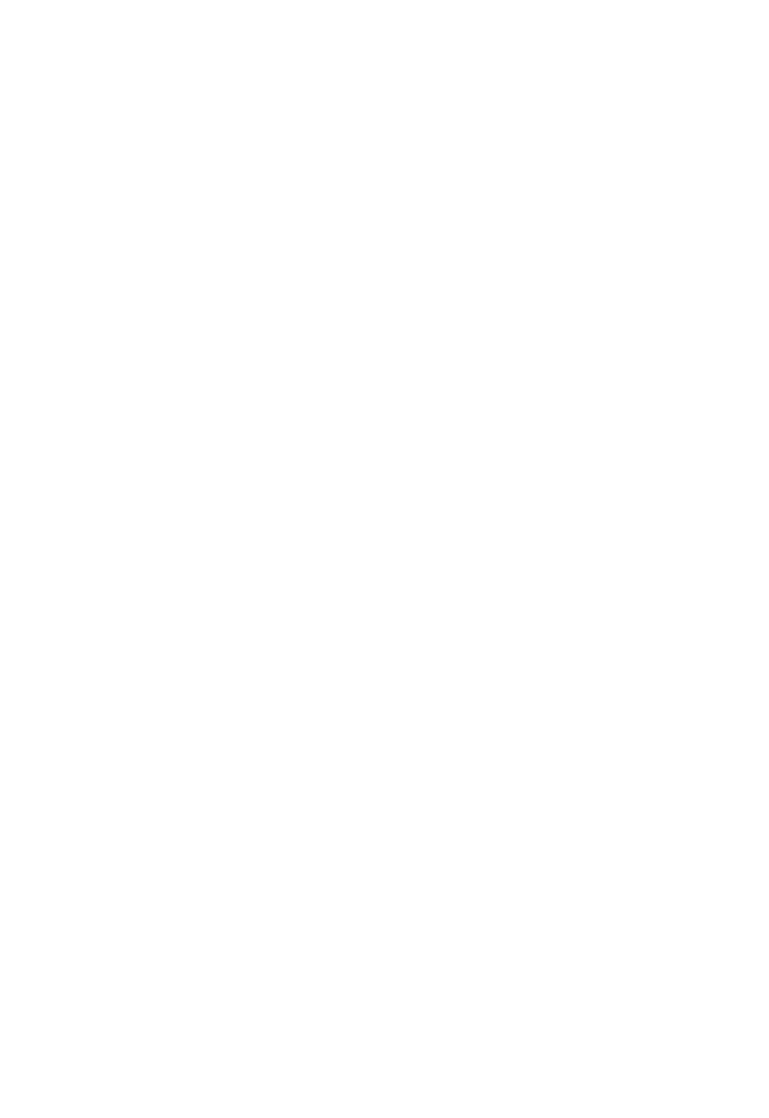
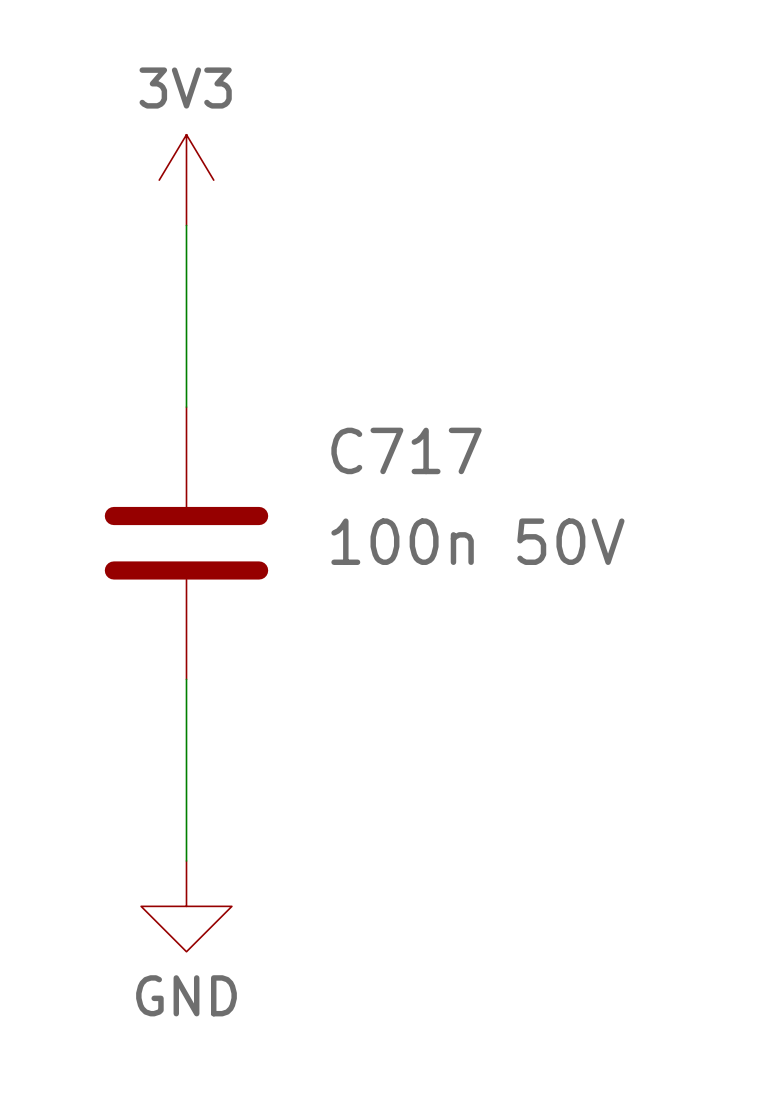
power symbol: none -> 3V3 (186, 180)
wire: none -> (186, 225) (186, 407)
C717: none -> 100n 50V (186, 543)
wire: none -> (186, 679) (186, 860)
power symbol: none -> GND (186, 906)

